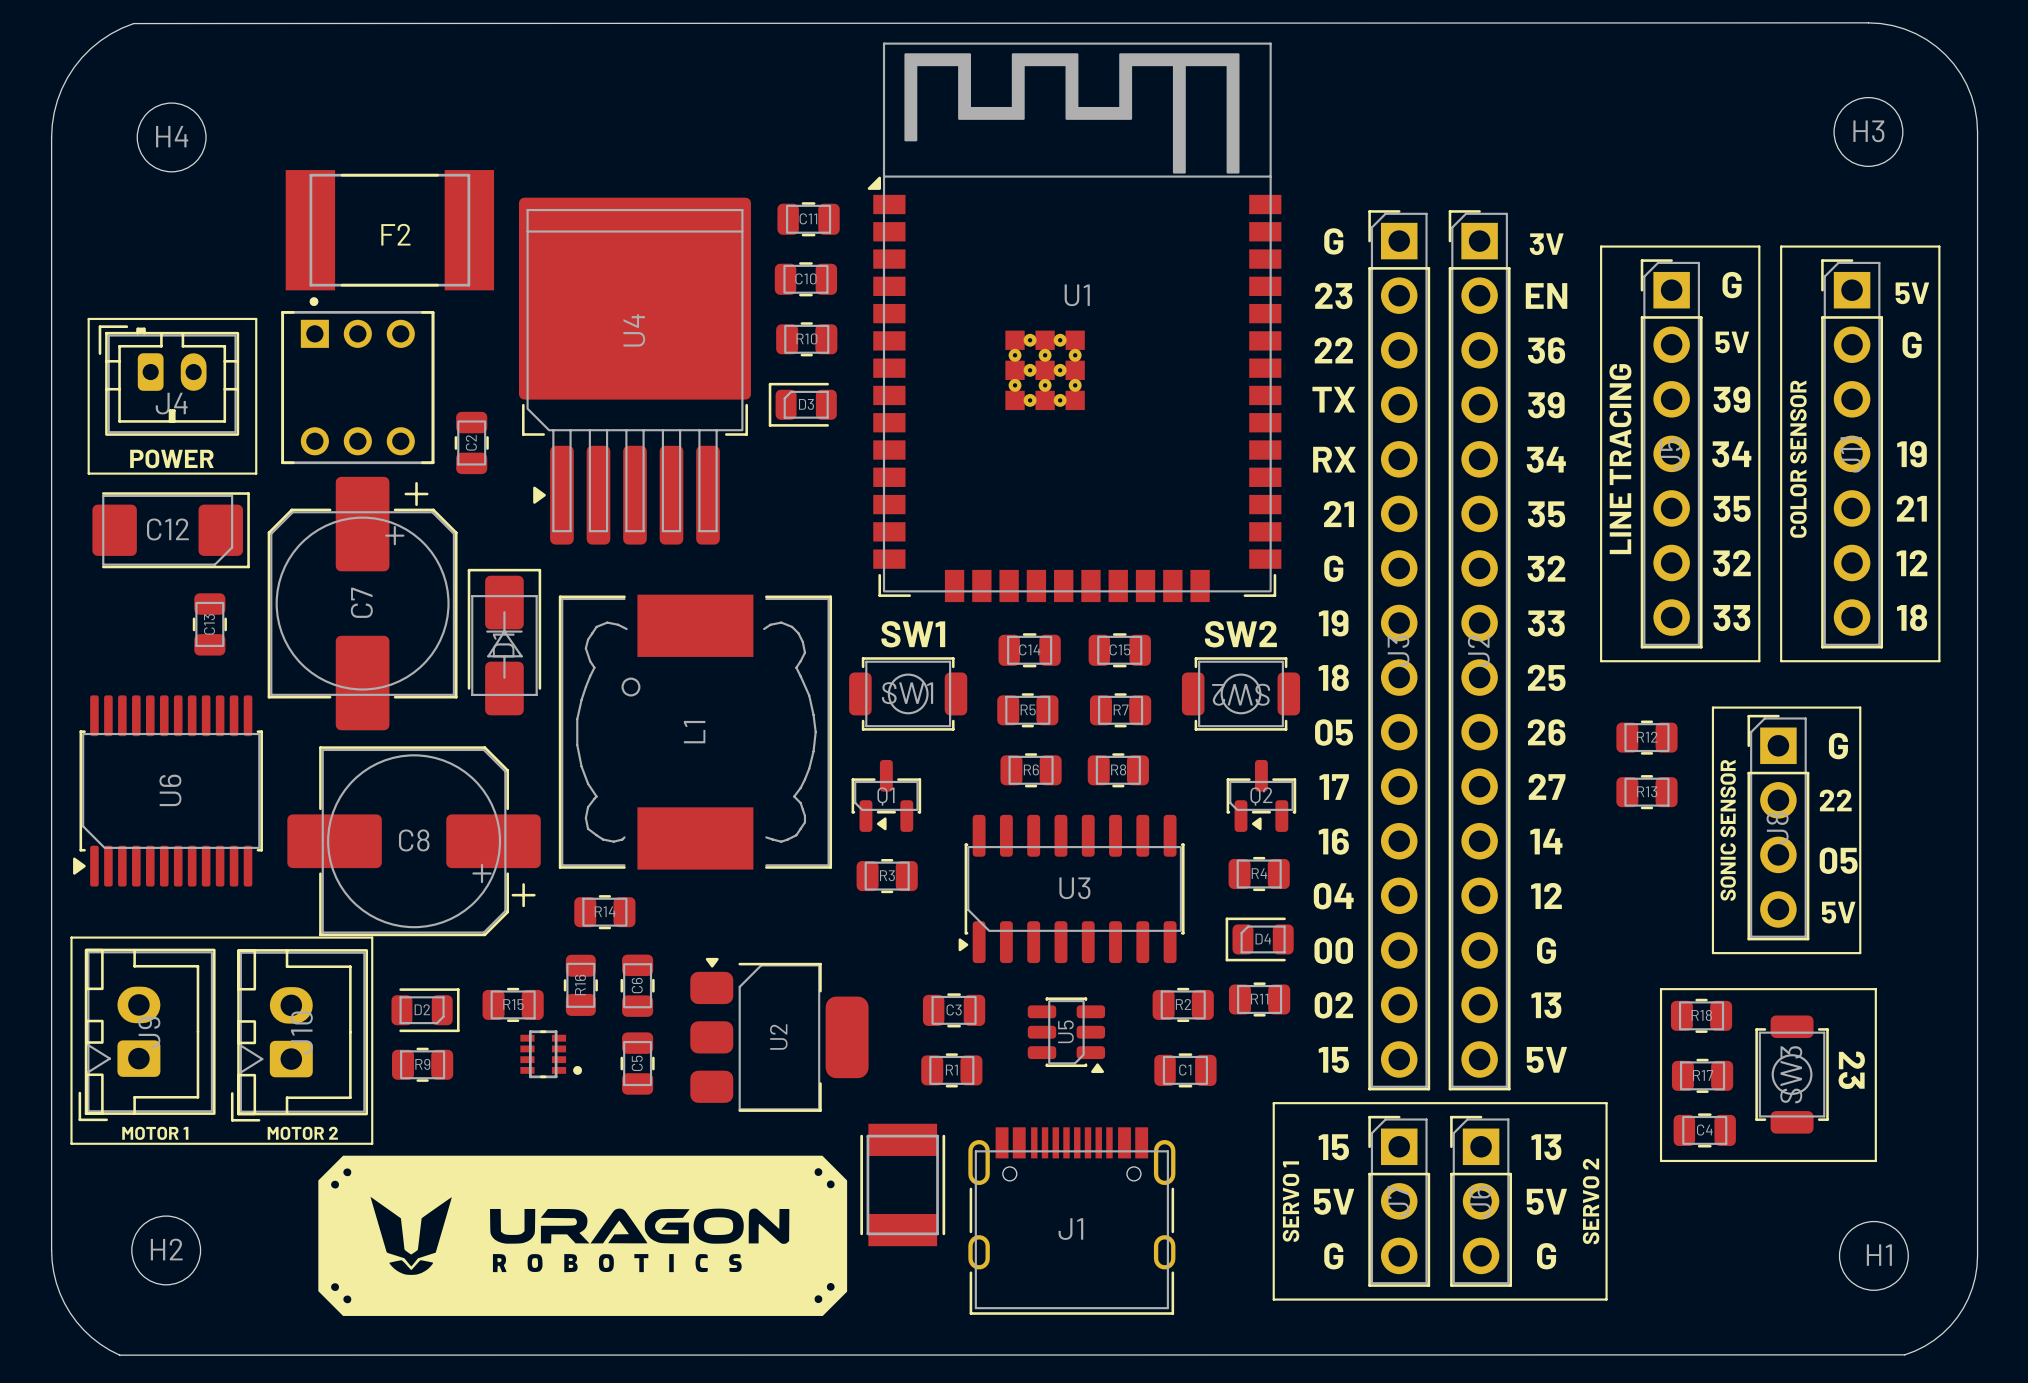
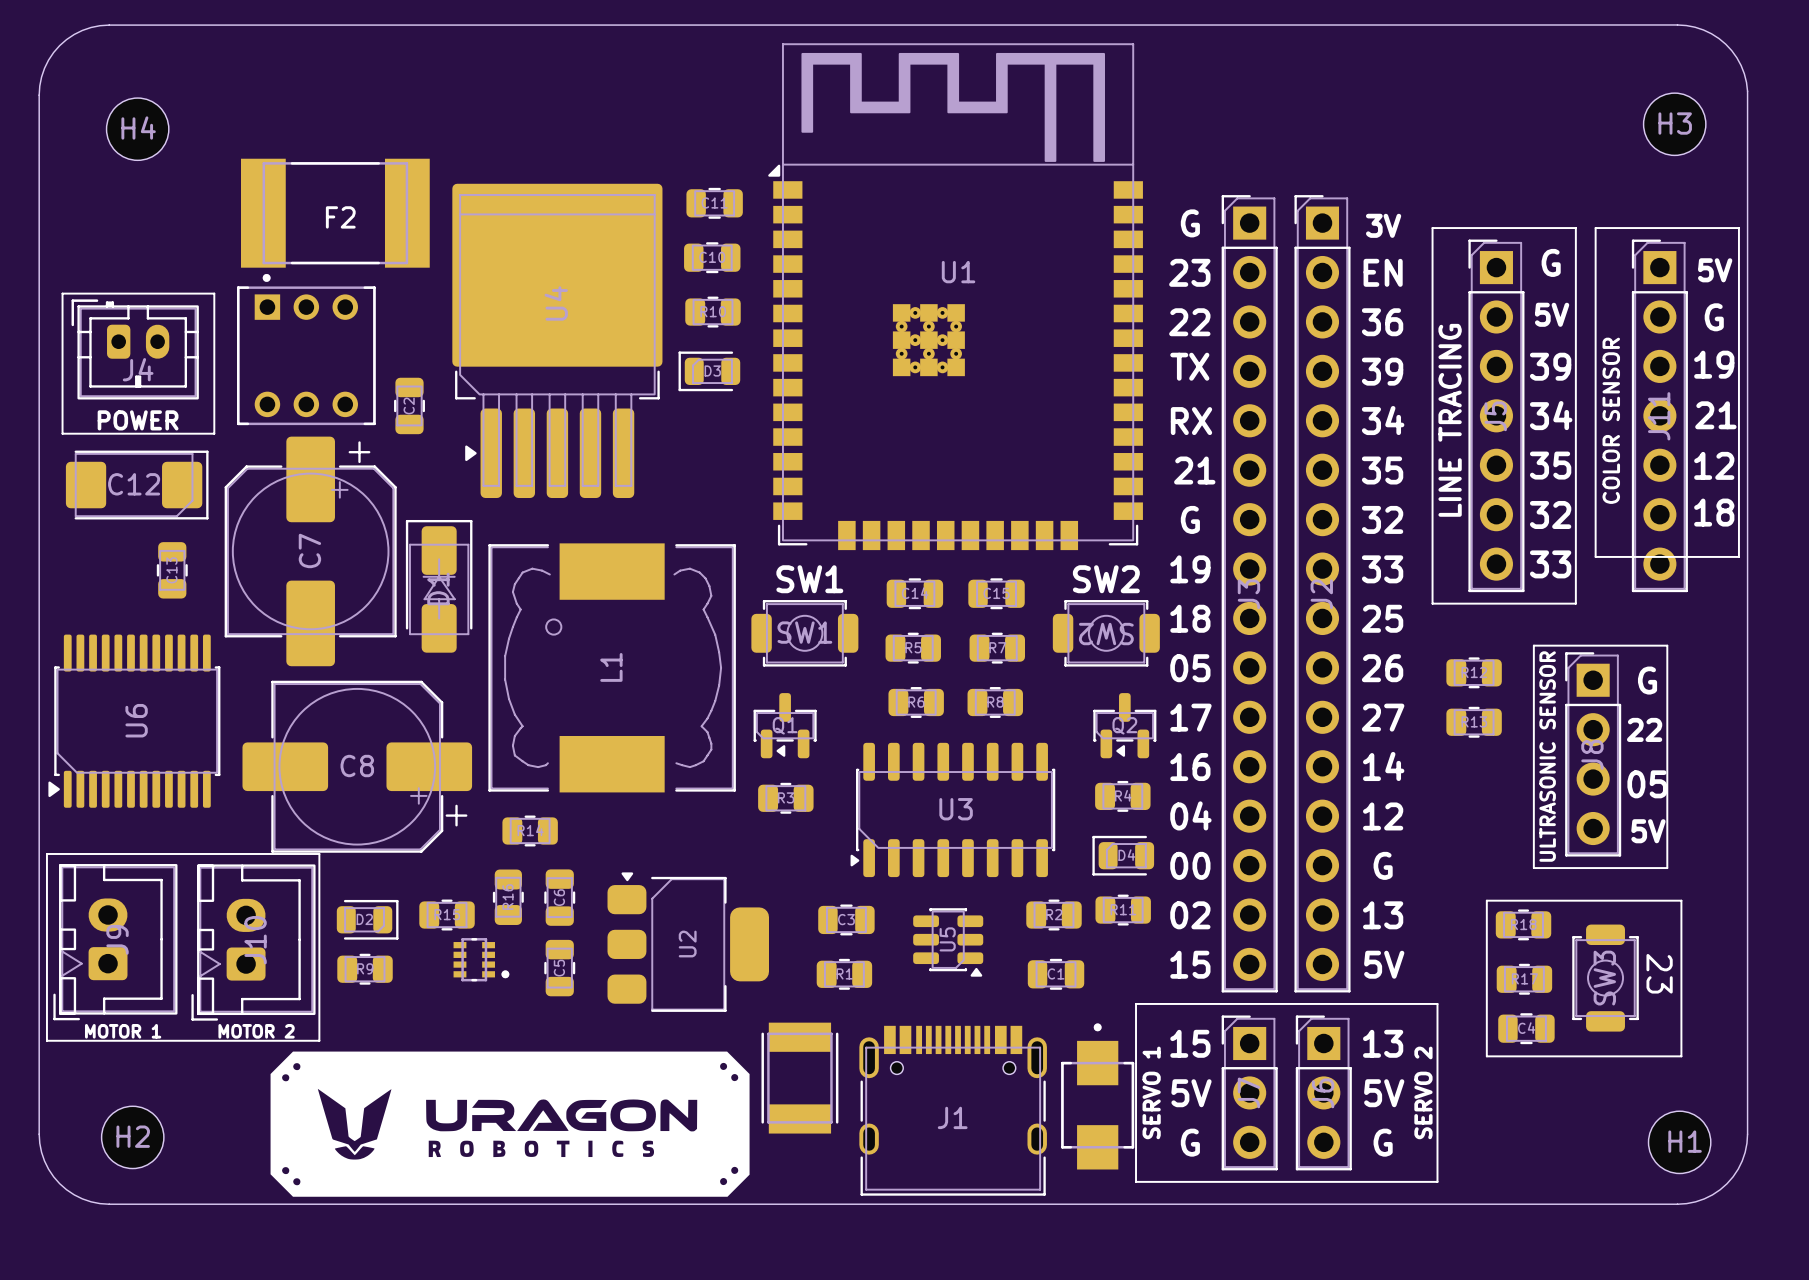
board edge: (1868, 22) (133, 23) (100, 40) (74, 67) (61, 88) (54, 112) (51, 137) (51, 1250) (53, 1272) (59, 1293) (76, 1321) (91, 1337) (119, 1355) (1904, 1354) (1934, 1340) (1957, 1317) (1968, 1298) (1975, 1277) (1977, 1255) (1977, 131) (1971, 95) (1960, 73) (1945, 54) (1926, 39) (1904, 28) (1868, 22) -> (1677, 24) (109, 25) (82, 30) (66, 39) (53, 52) (44, 68) (39, 95) (39, 1134) (41, 1152) (53, 1176) (66, 1189) (82, 1198) (109, 1204) (1677, 1204) (1695, 1201) (1720, 1189) (1738, 1169) (1745, 1152) (1747, 1134) (1747, 91) (1741, 65) (1725, 44) (1703, 29) (1677, 24)
text: none -> 21 (1715, 415)
text position: 19 (1911, 454) -> 19 (1714, 364)
text: 21 (1911, 508) -> 12 (1714, 465)
text: 12 (1911, 563) -> none
line: (1781, 609) (1781, 661) (1939, 661) (1939, 609) -> (1595, 556) (1738, 556)
text position: 18 (1912, 617) -> 18 (1714, 512)
text: SONIC SENSOR (1728, 830) -> ULTRASONIC SENSOR (1547, 756)
part: none -> (1097, 1096)

